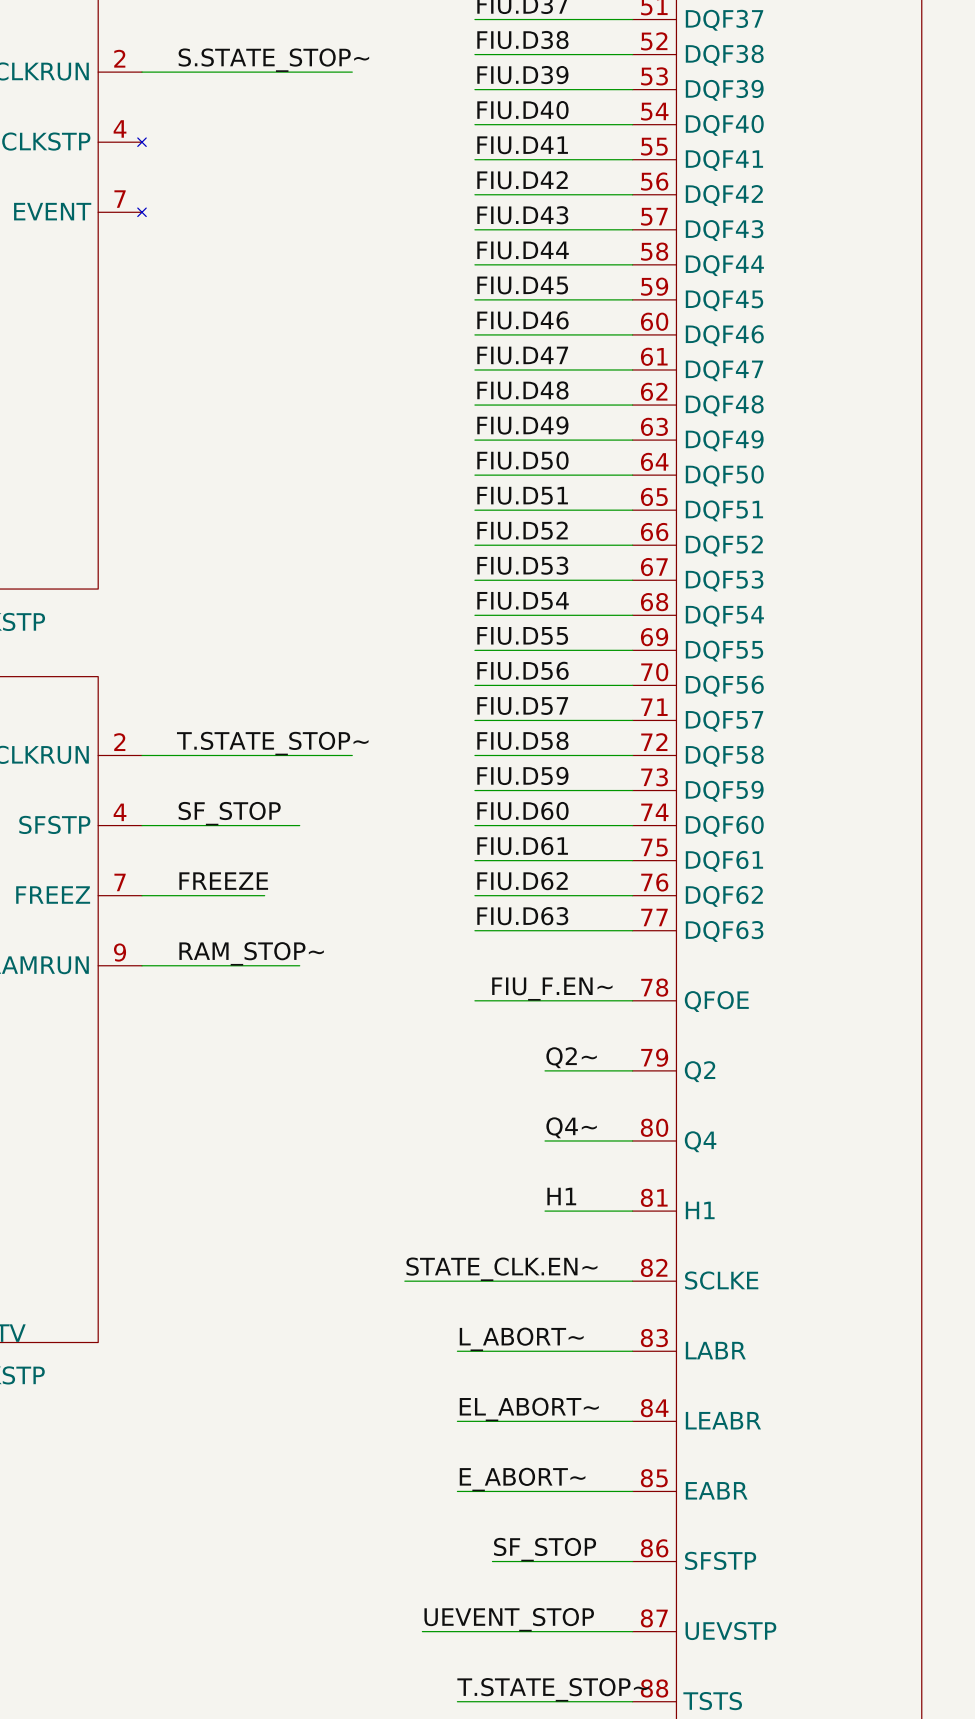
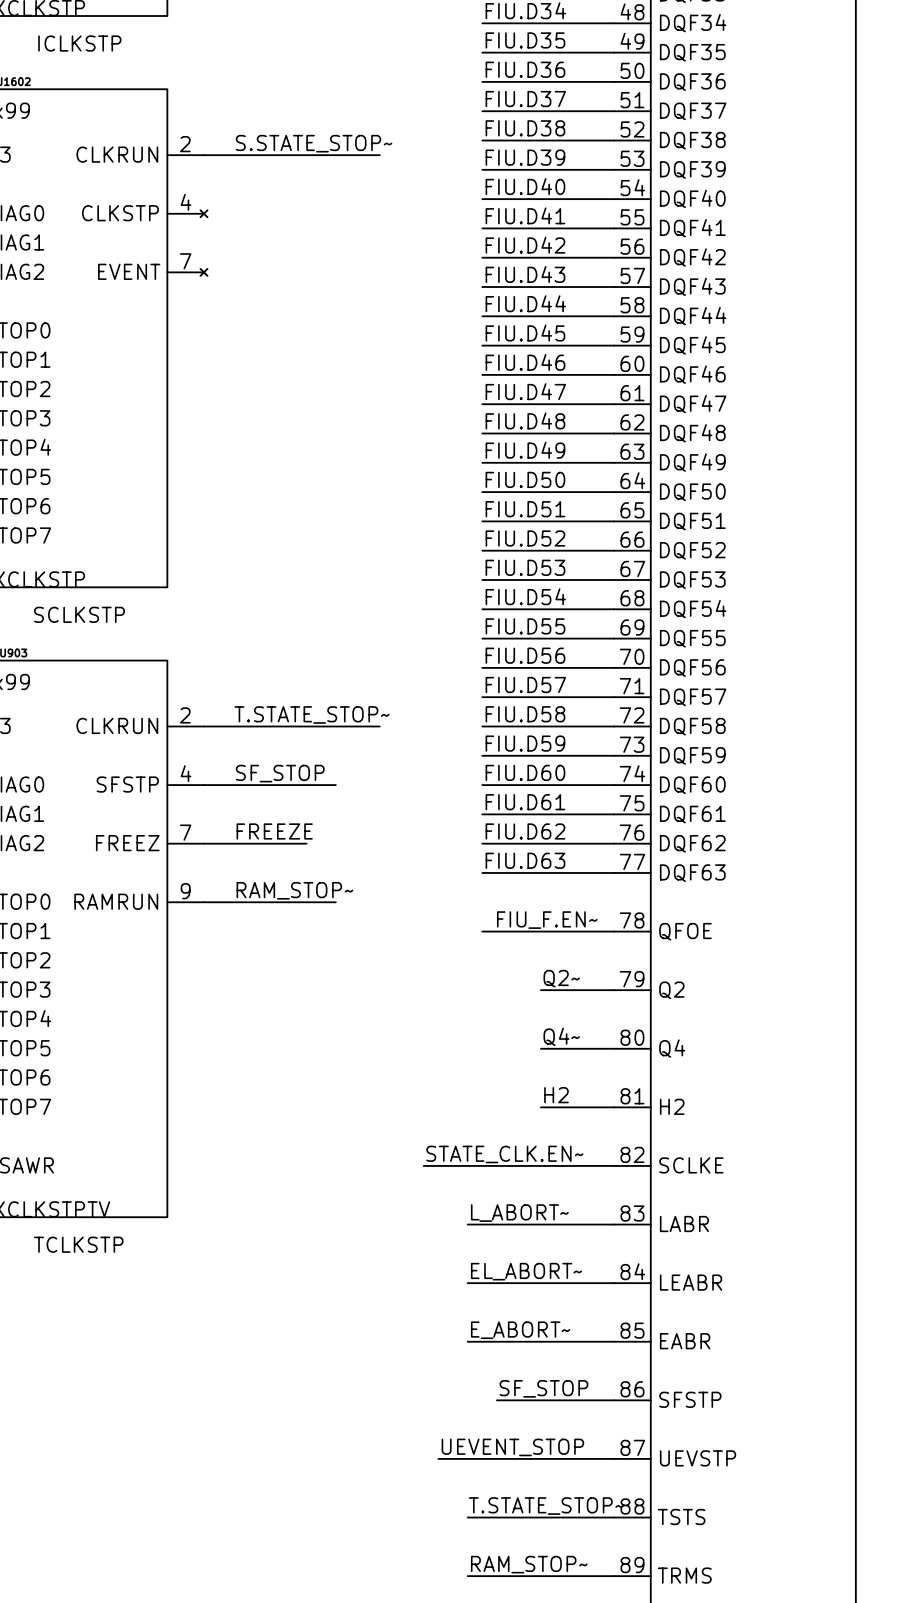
label: H1 (561, 1196) -> H2 (556, 1095)
part pin name: H1 (700, 1210) -> H2 (672, 1106)

